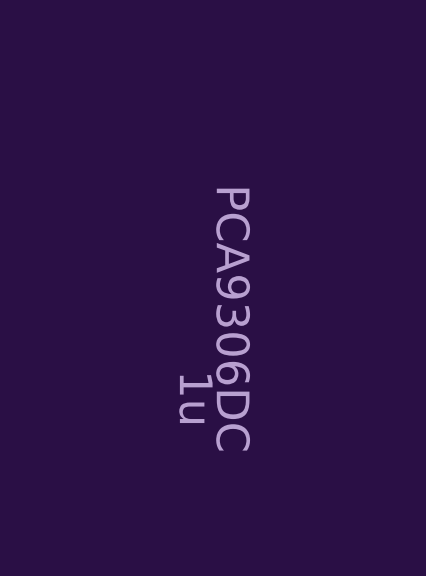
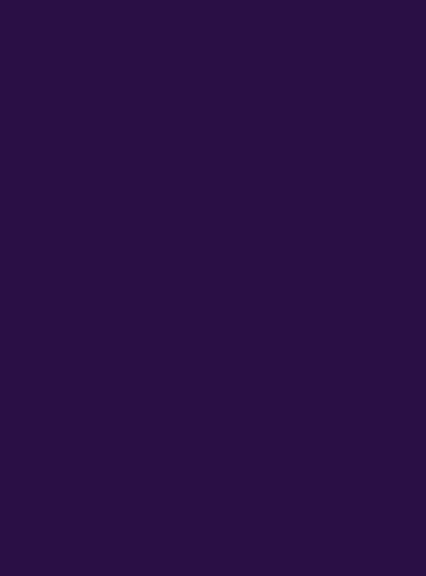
part: PCA9306DC (233, 319) -> none
part: 1u (195, 399) -> none

